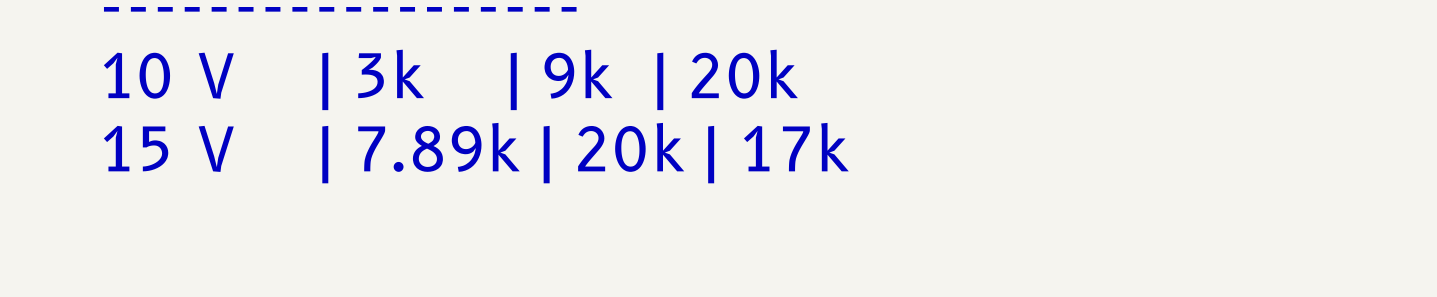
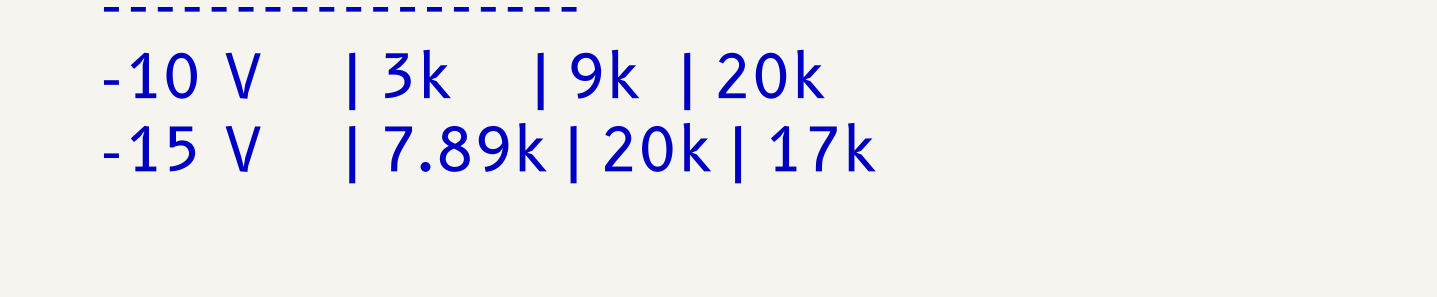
text: 10 V | 3k | 9k | 20k (450, 79) -> -10 V | 3k | 9k | 20k (464, 79)
text: 15 V | 7.89k | 20k | 17k (476, 153) -> -15 V | 7.89k | 20k | 17k (489, 153)

